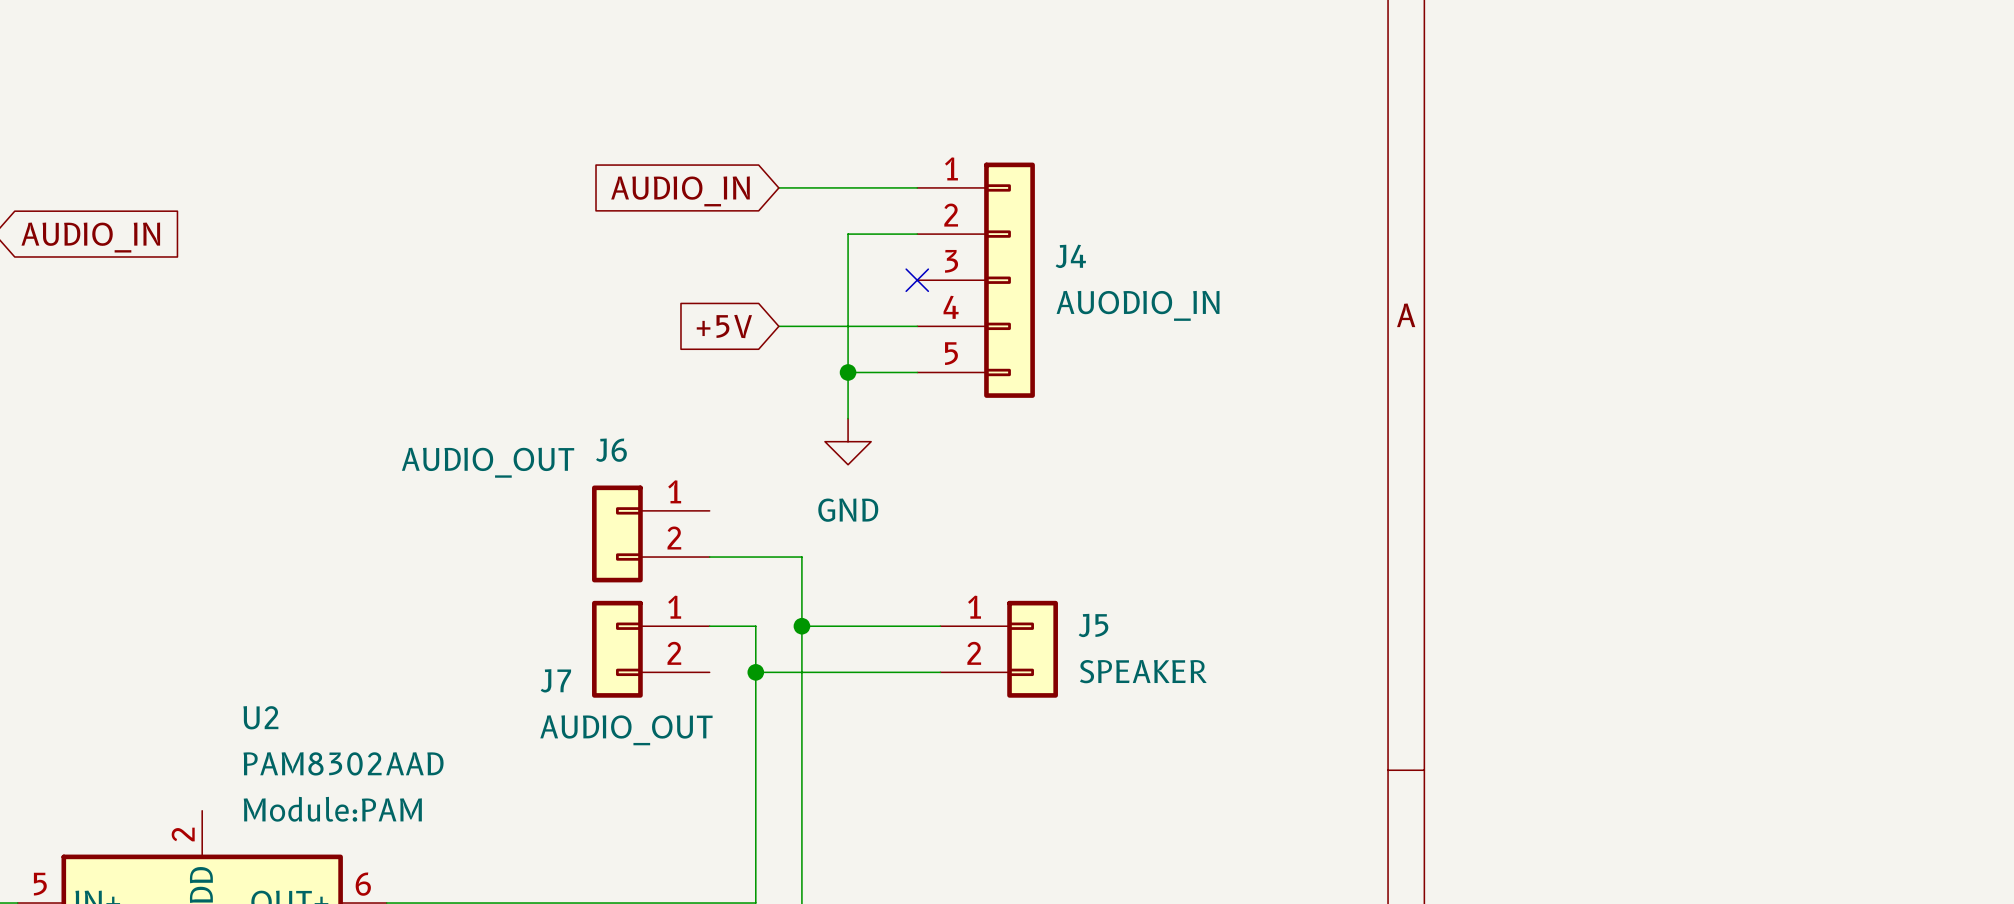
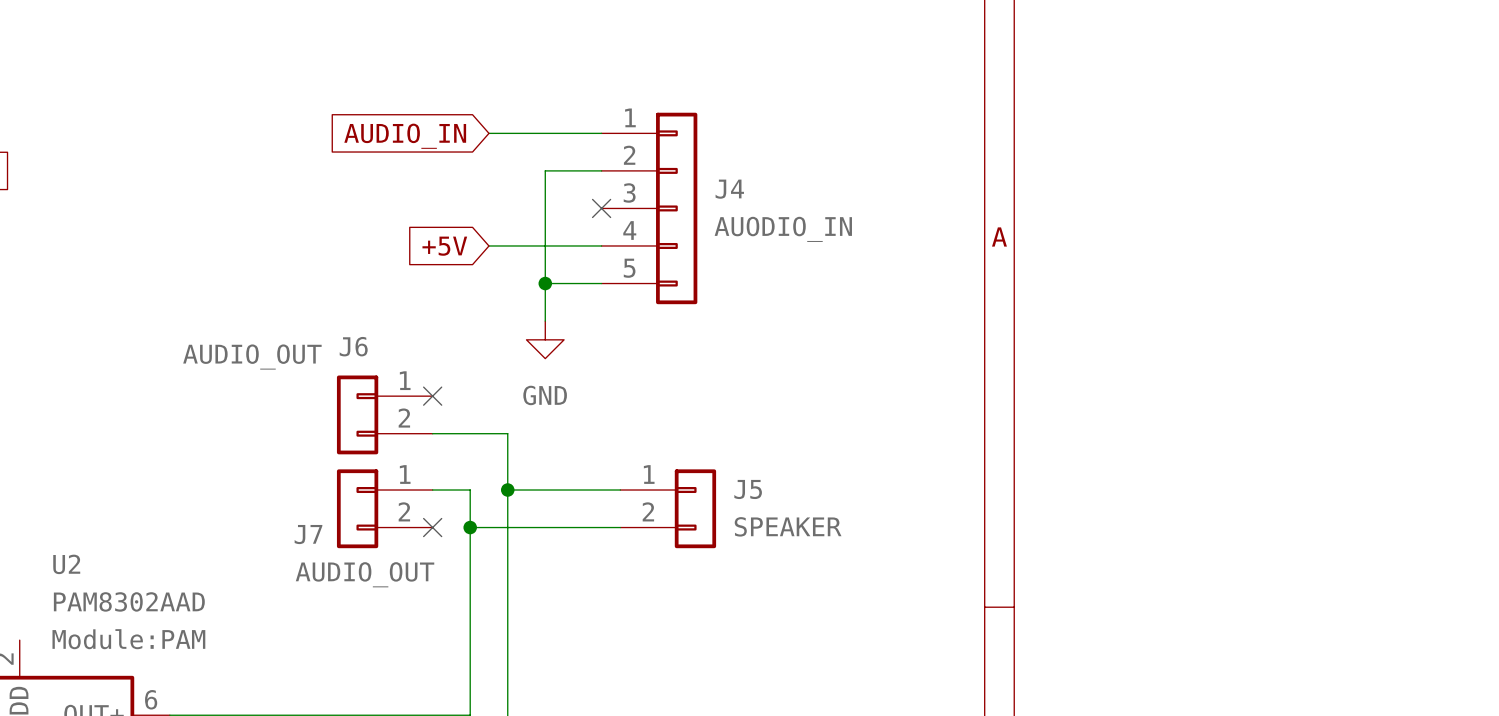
no-connect mark: none -> (432, 396)
no-connect mark: none -> (432, 527)

